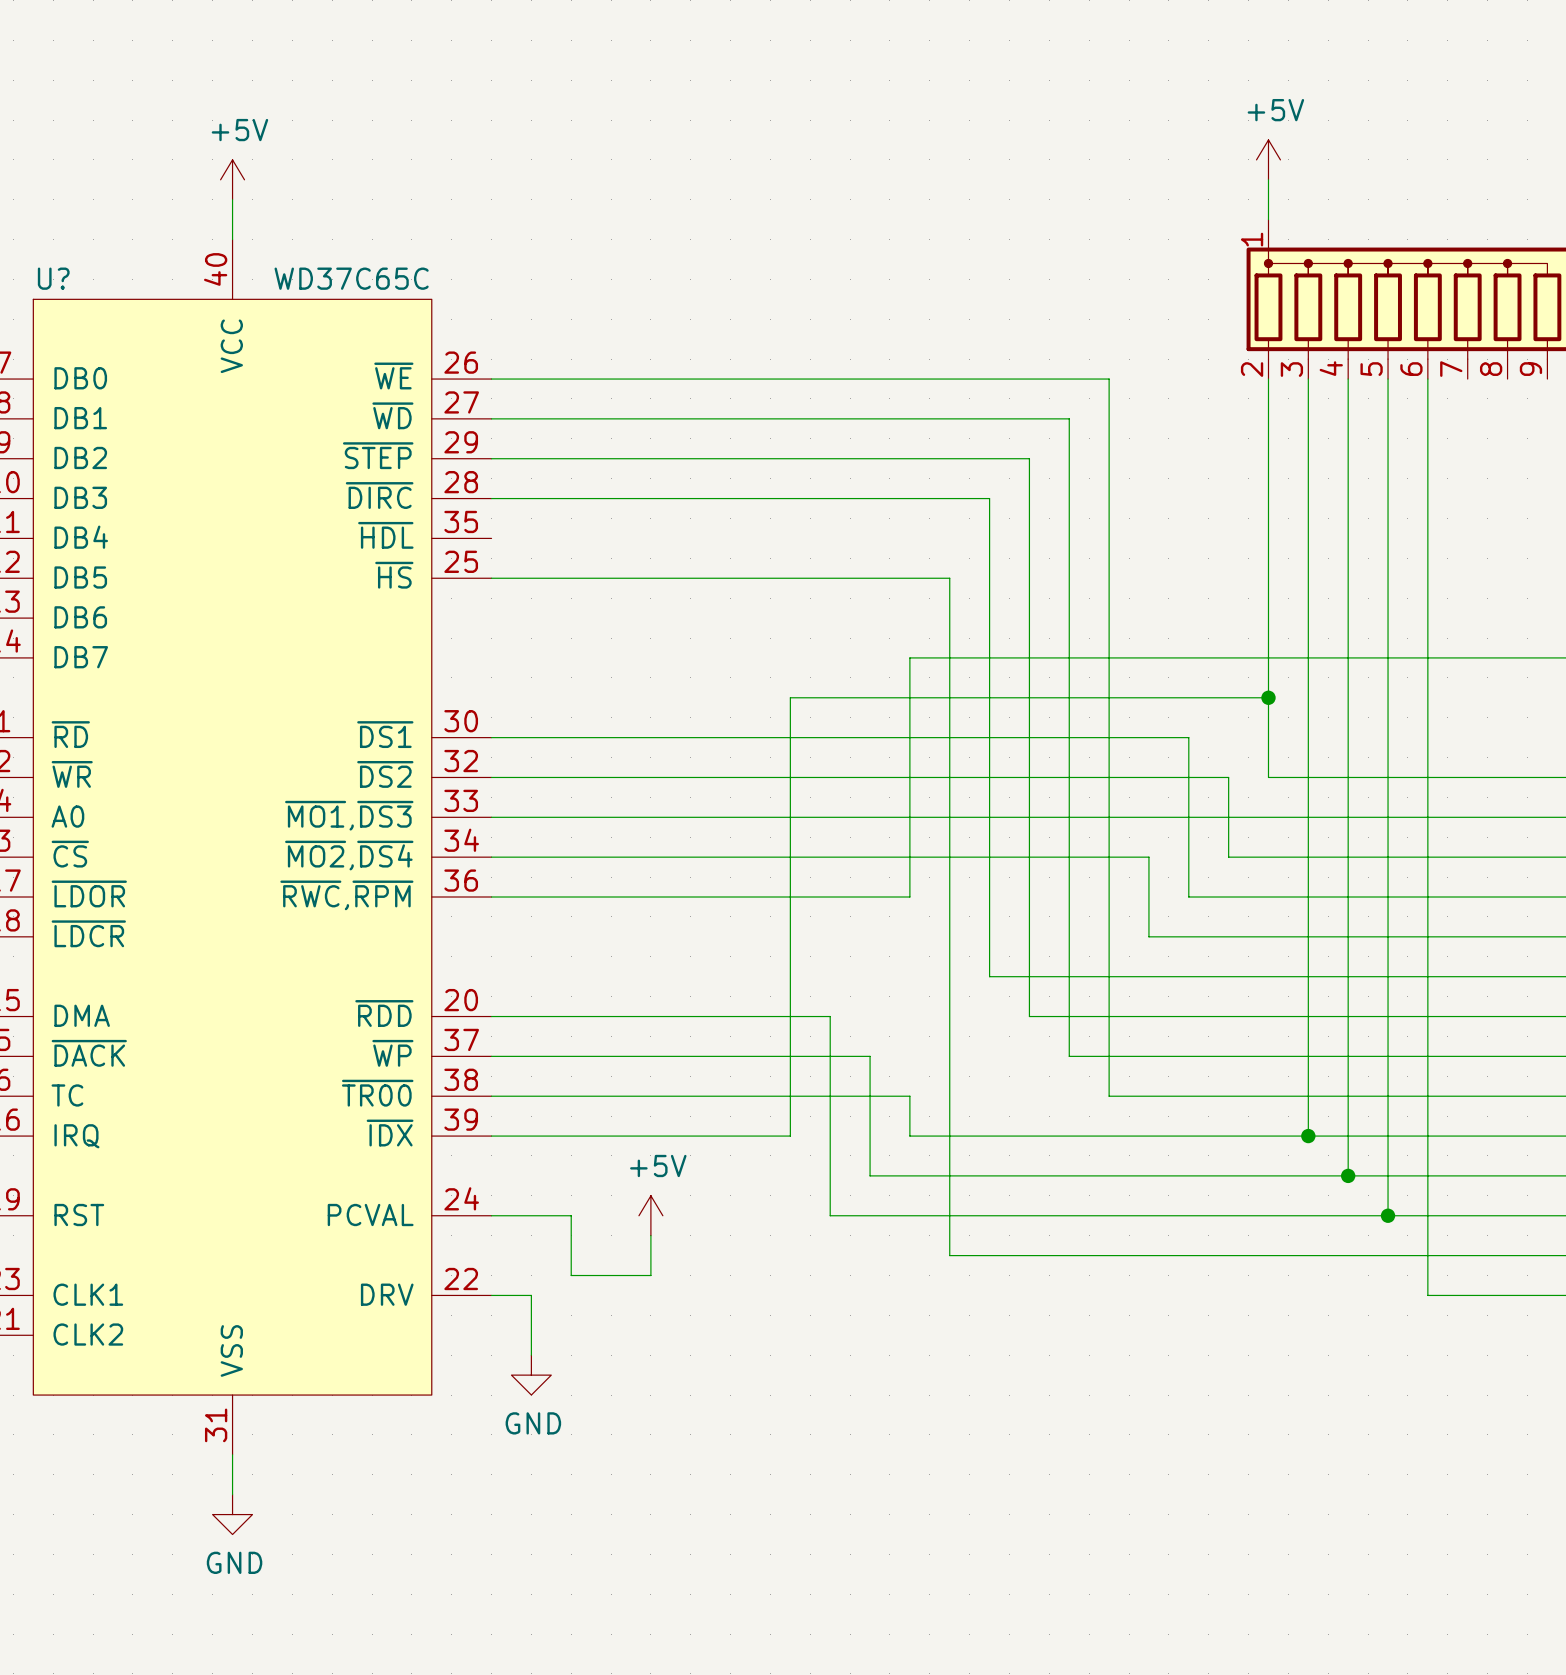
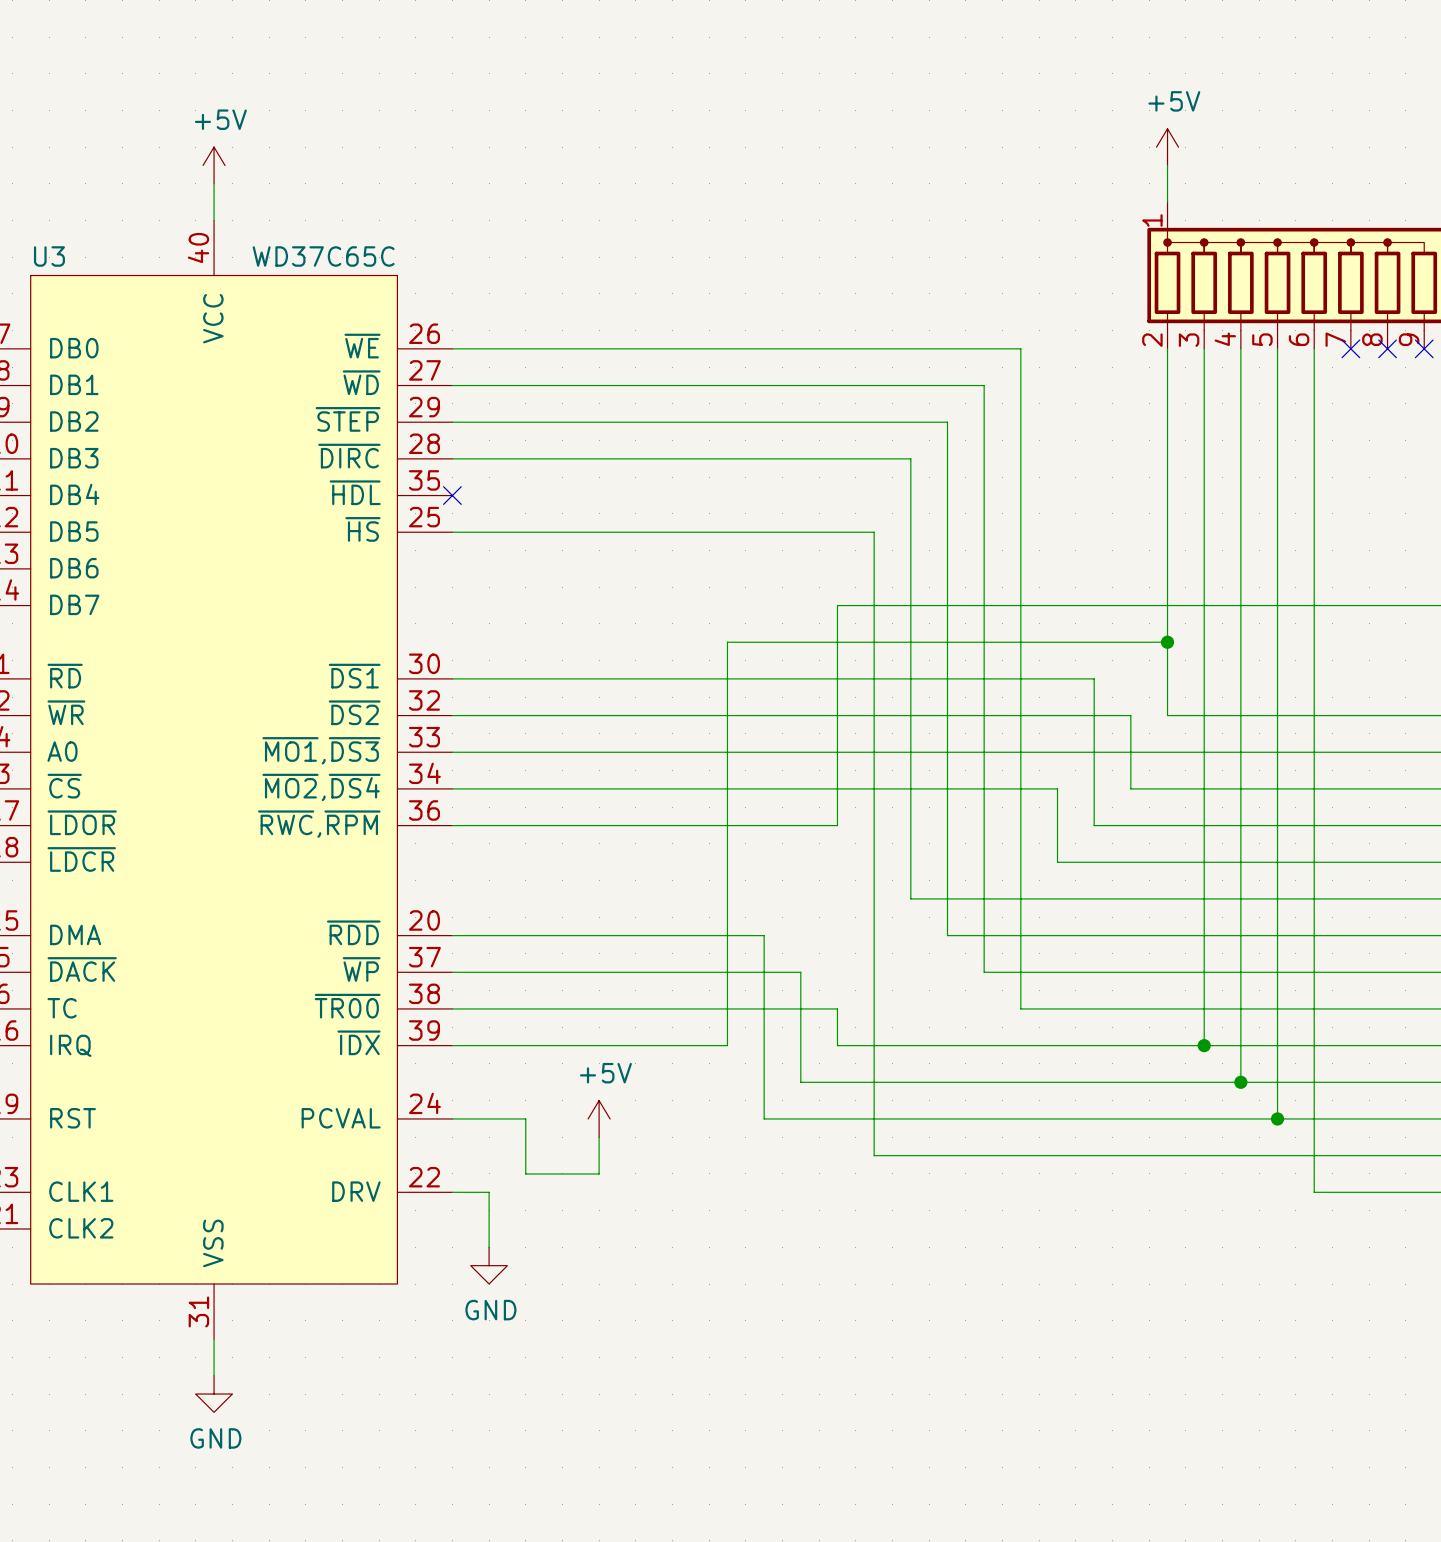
U? name: U? (53, 278) -> U3 (49, 256)
no-connect mark: none -> (1350, 348)
no-connect mark: none -> (1387, 348)
no-connect mark: none -> (1424, 348)
no-connect mark: none -> (452, 495)

